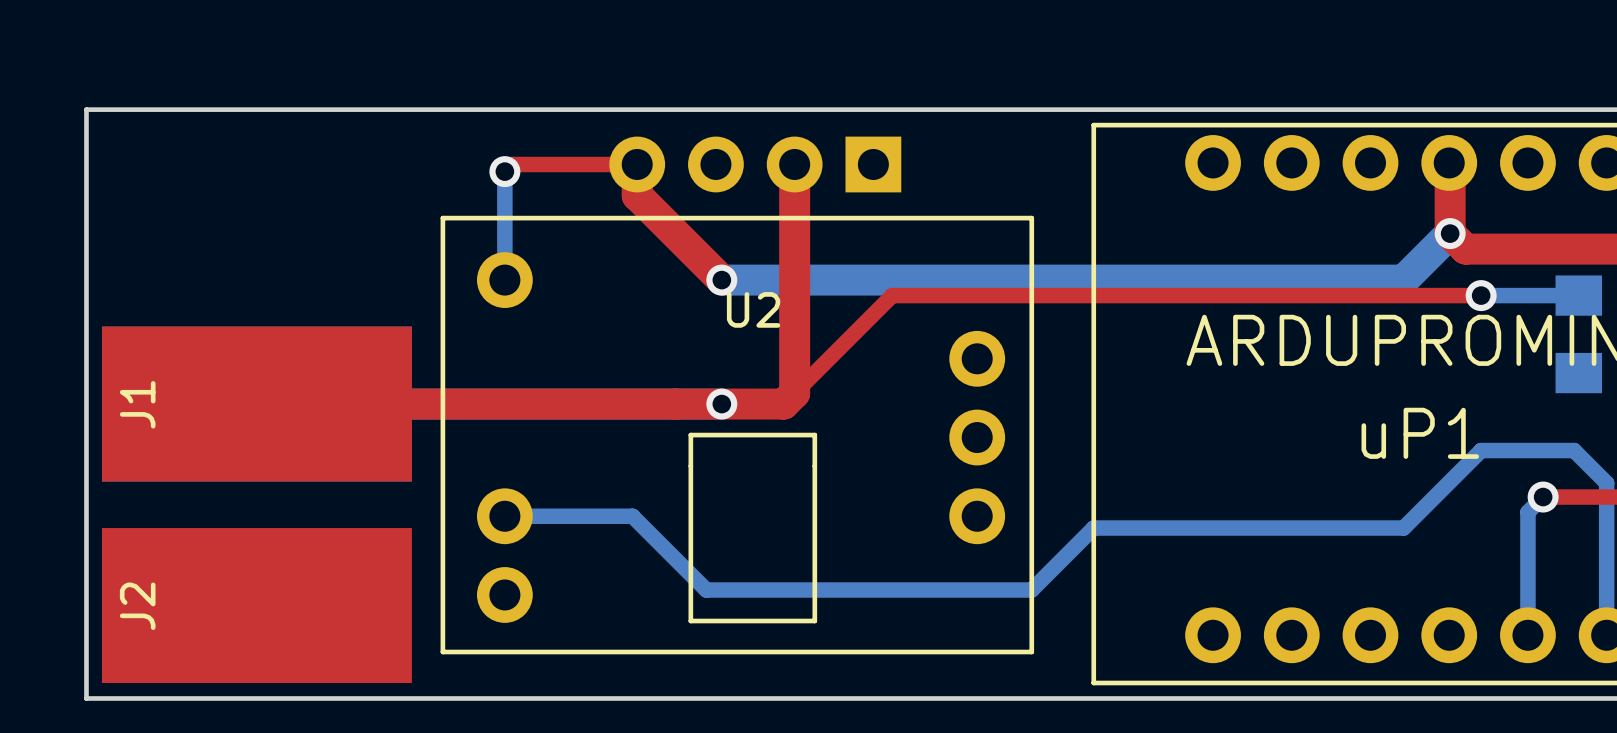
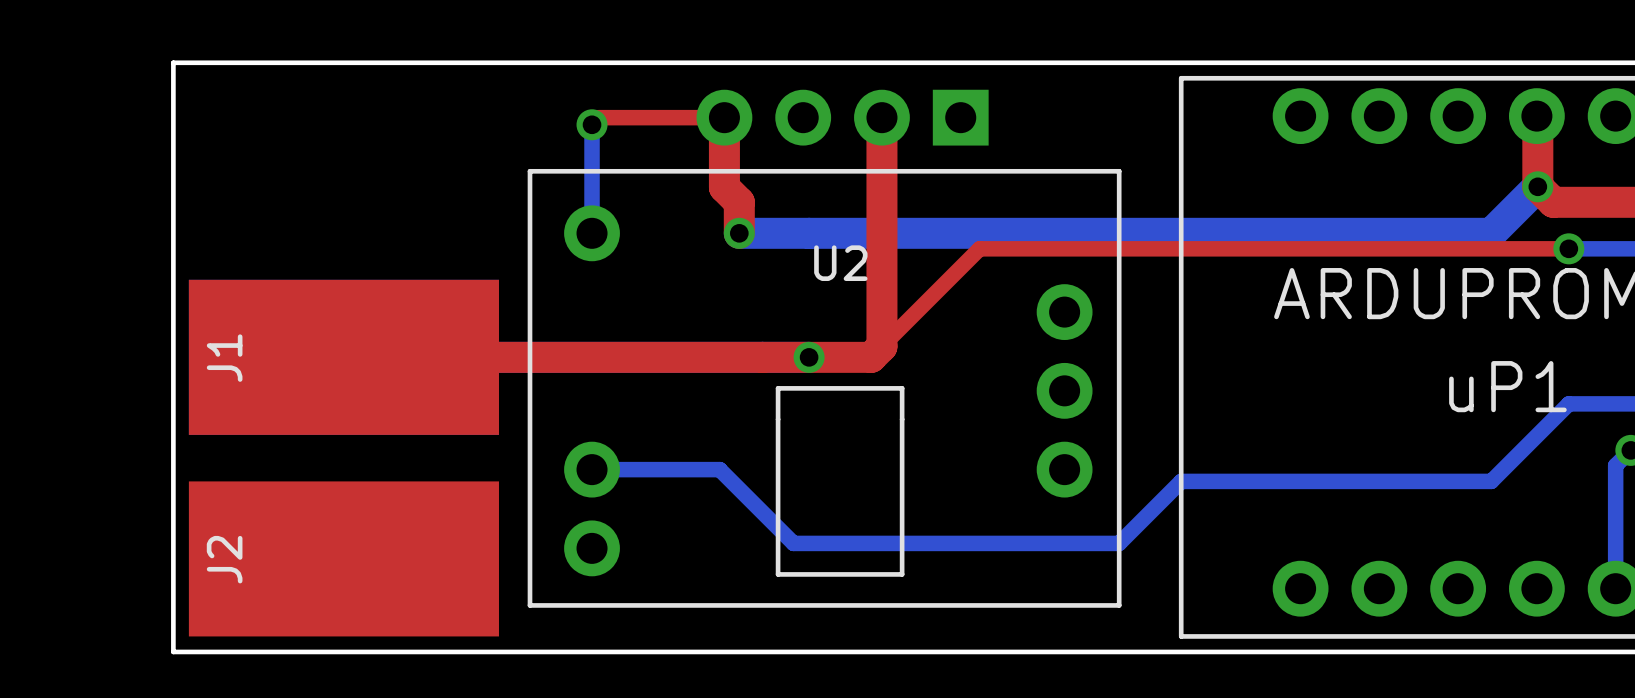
top track: (637, 195) (721, 280) -> (724, 148) (724, 187) (739, 202) (739, 233)
bottom track: none -> (739, 233) (809, 233)
via position: (721, 280) -> (739, 233)

